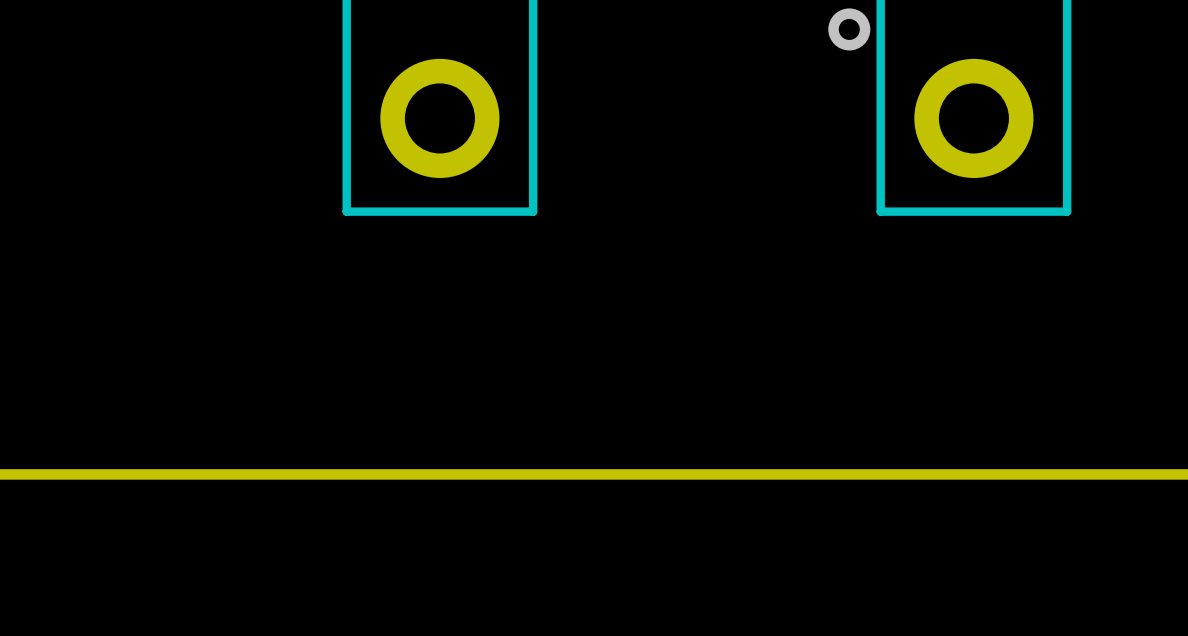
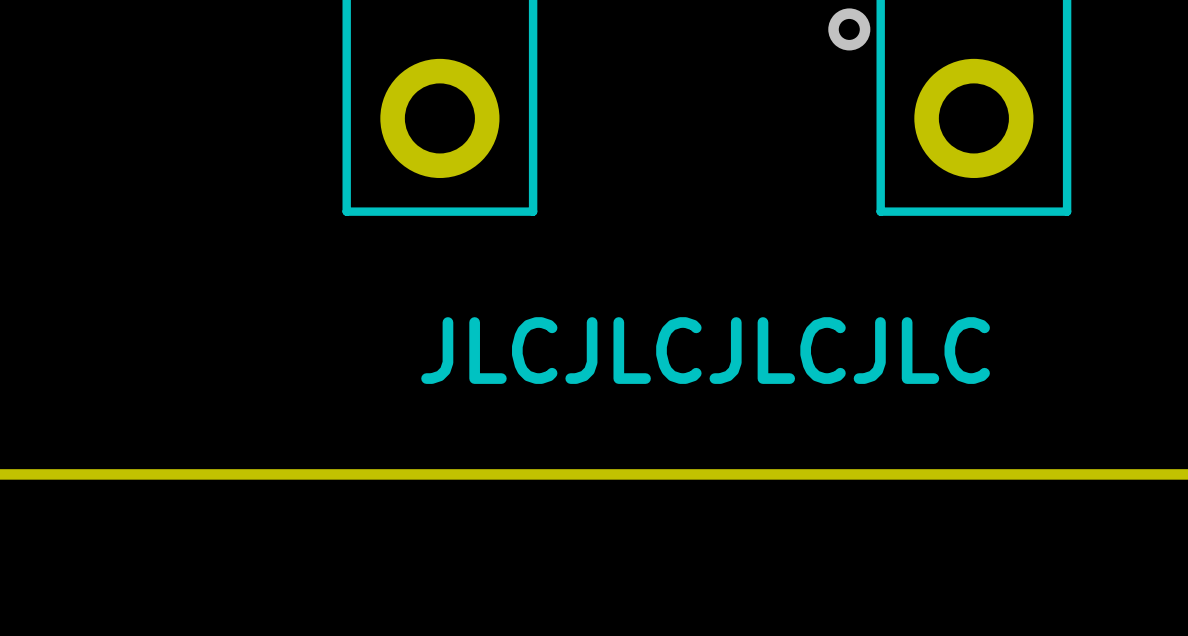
text: none -> JLCJLCJLCJLC (705, 350)

